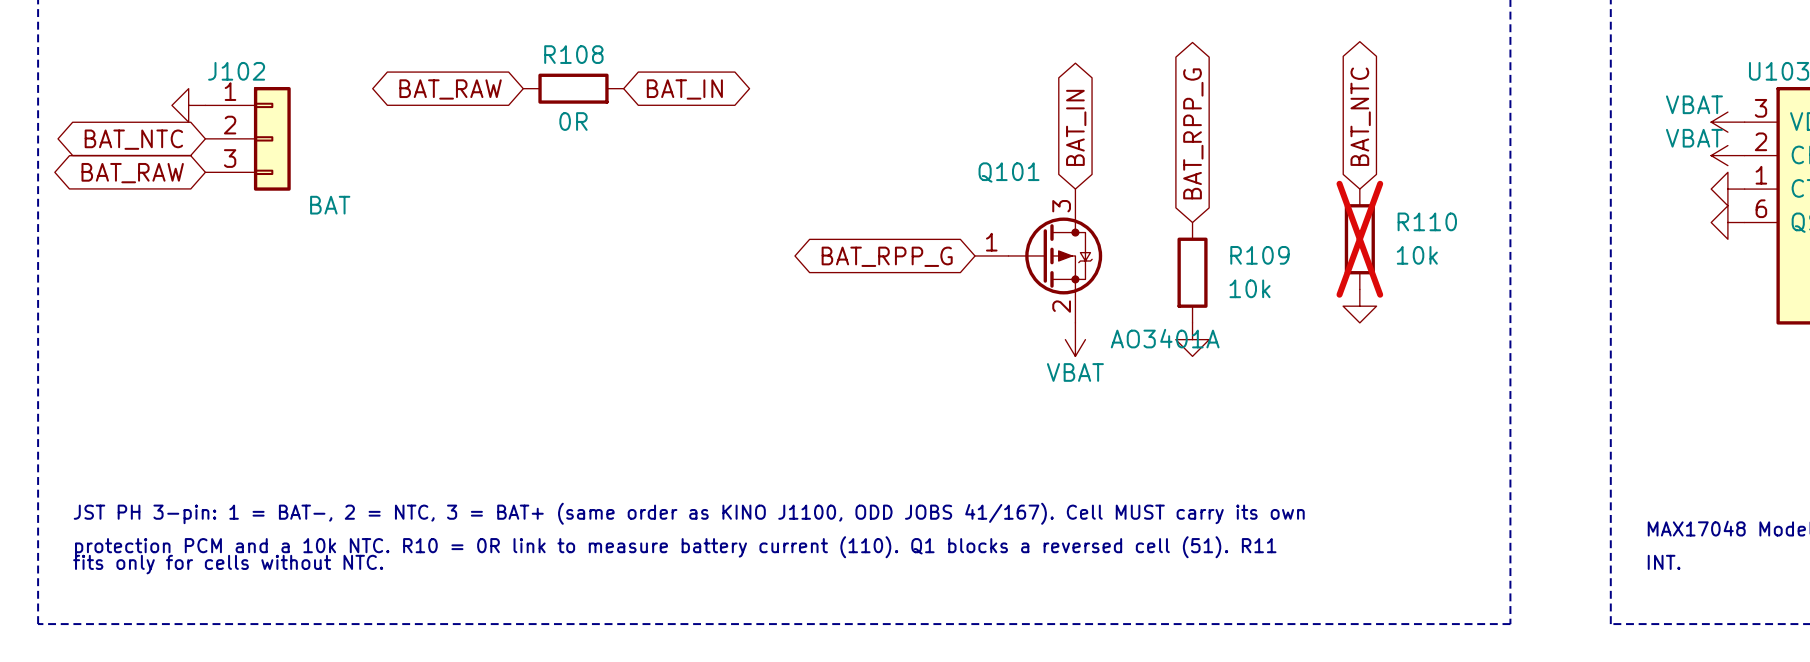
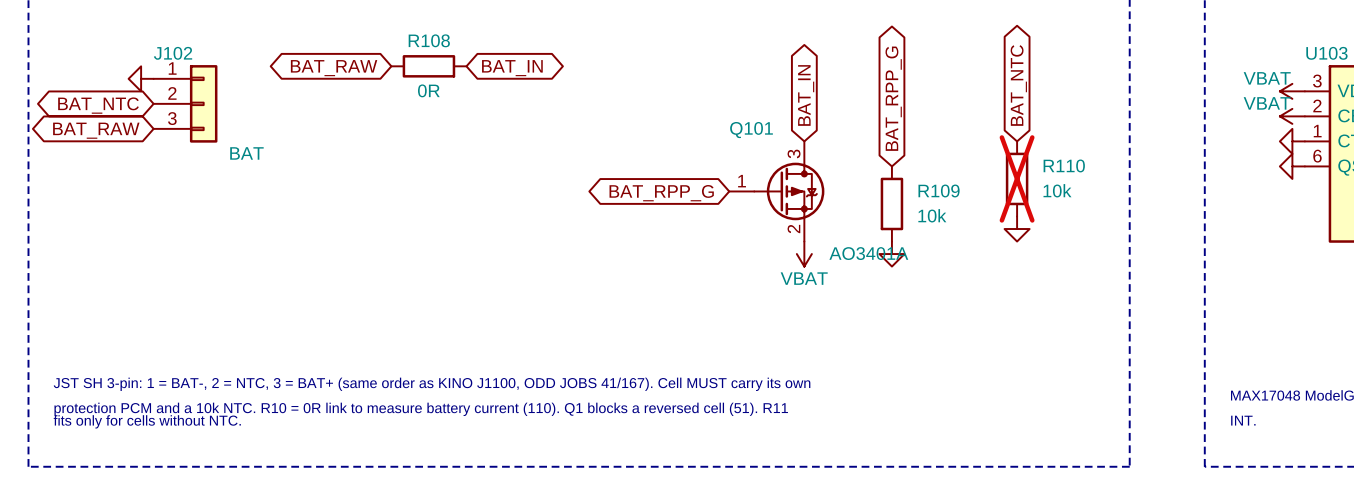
text: JST PH 3-pin: 1 = BAT-, 2 = NTC, 3 = BAT+ (same order as KINO J1100, ODD JOBS 41/167). Cell MUST carry its own (689, 513) -> JST SH 3-pin: 1 = BAT-, 2 = NTC, 3 = BAT+ (same order as KINO J1100, ODD JOBS 41/167). Cell MUST carry its own (432, 384)

